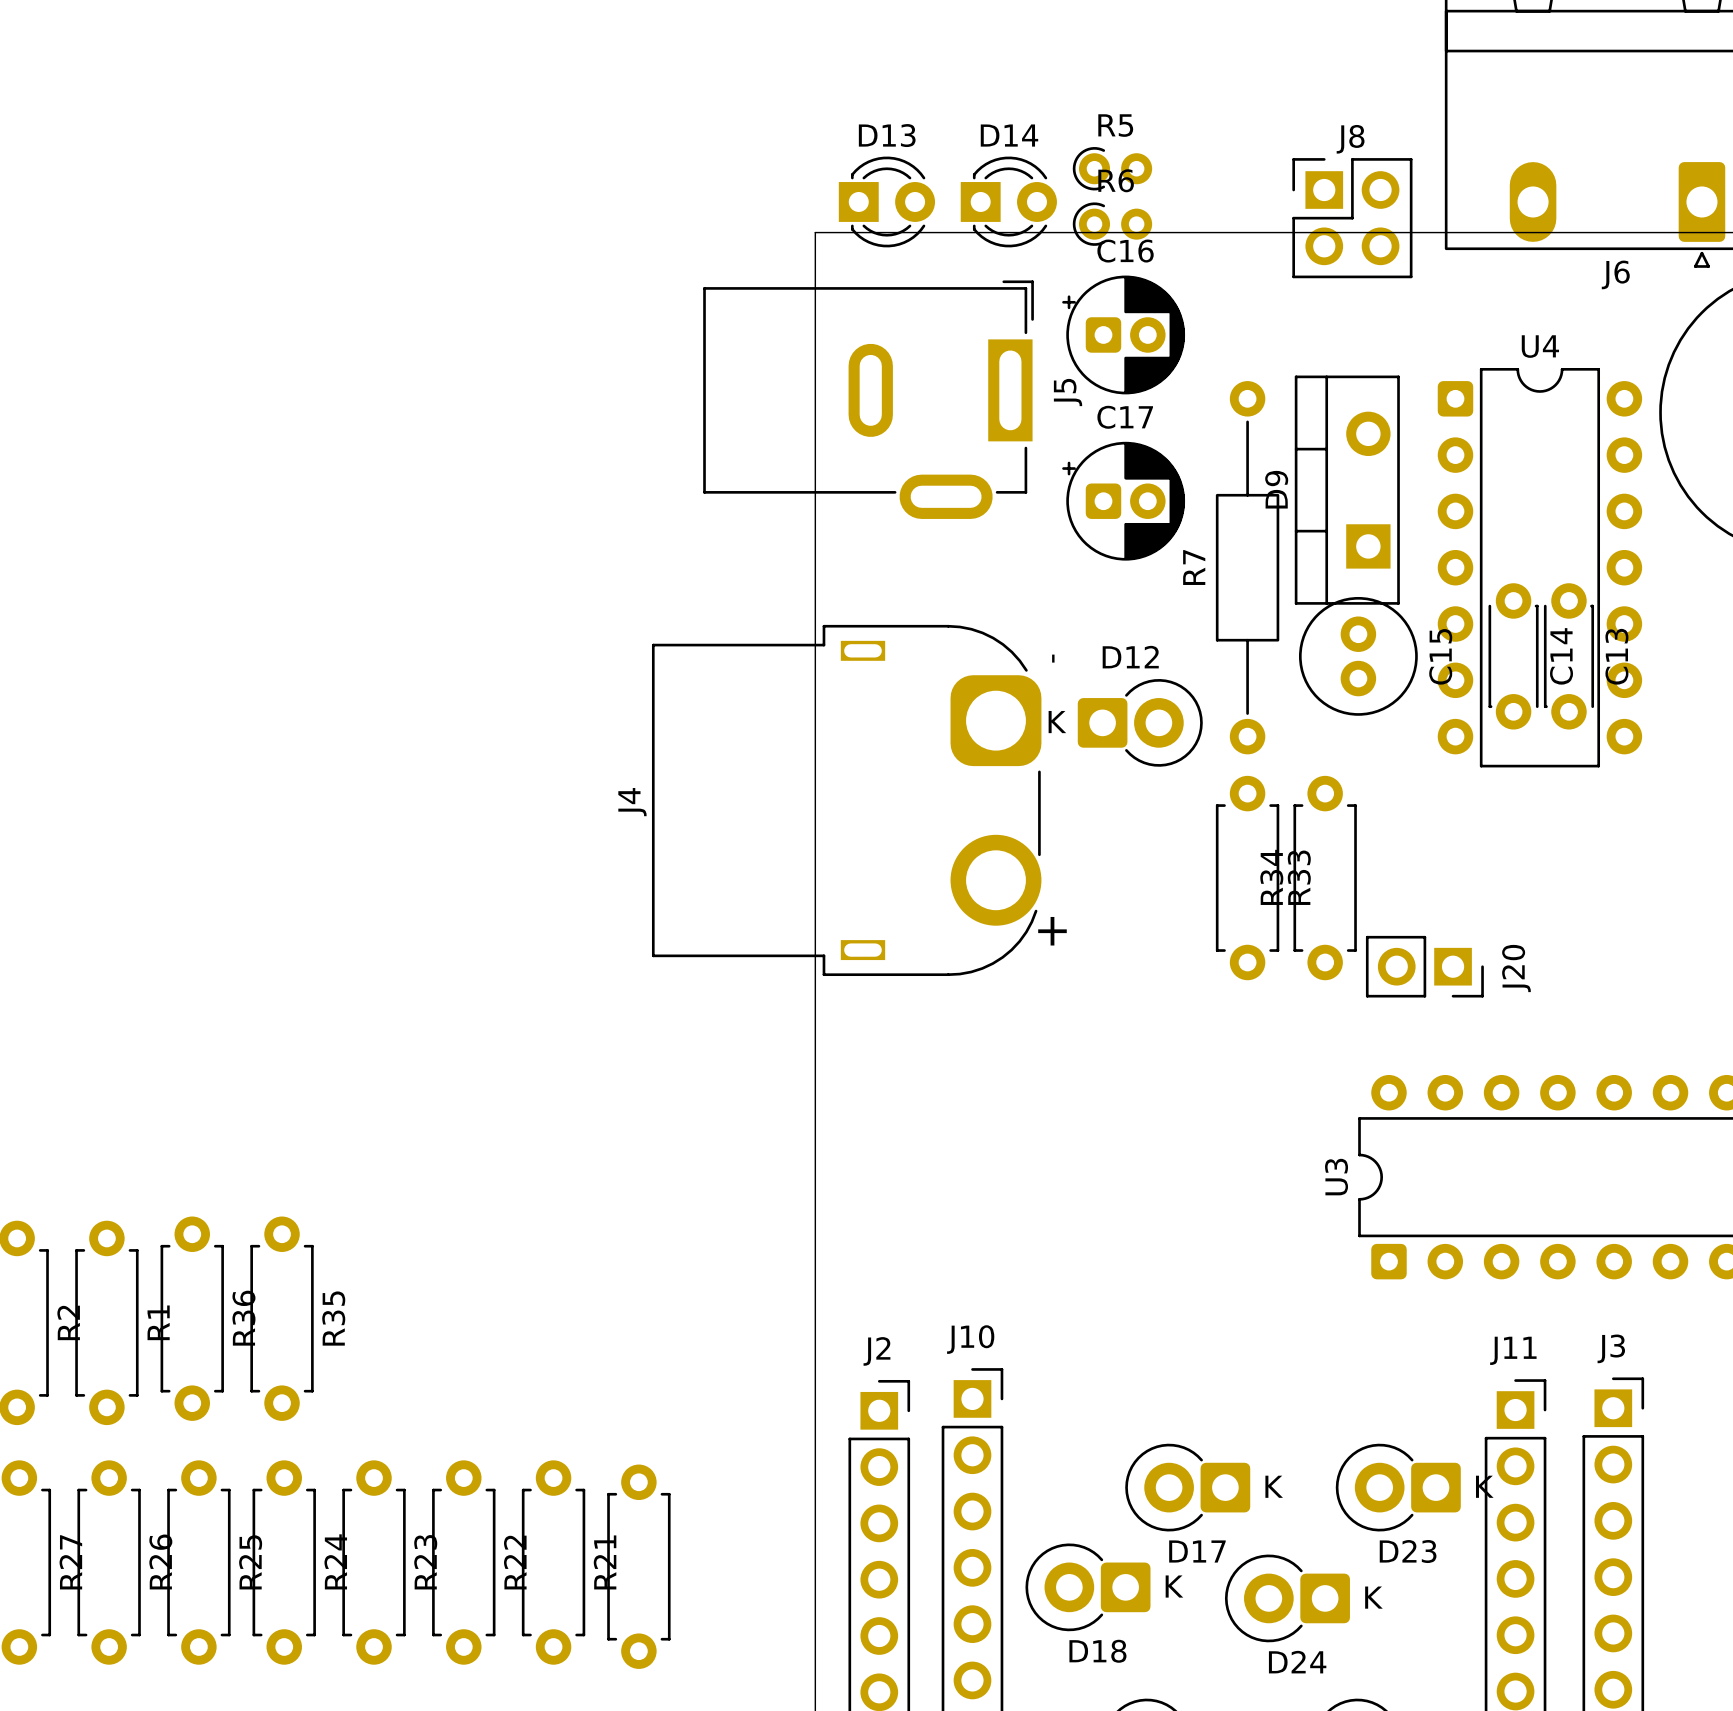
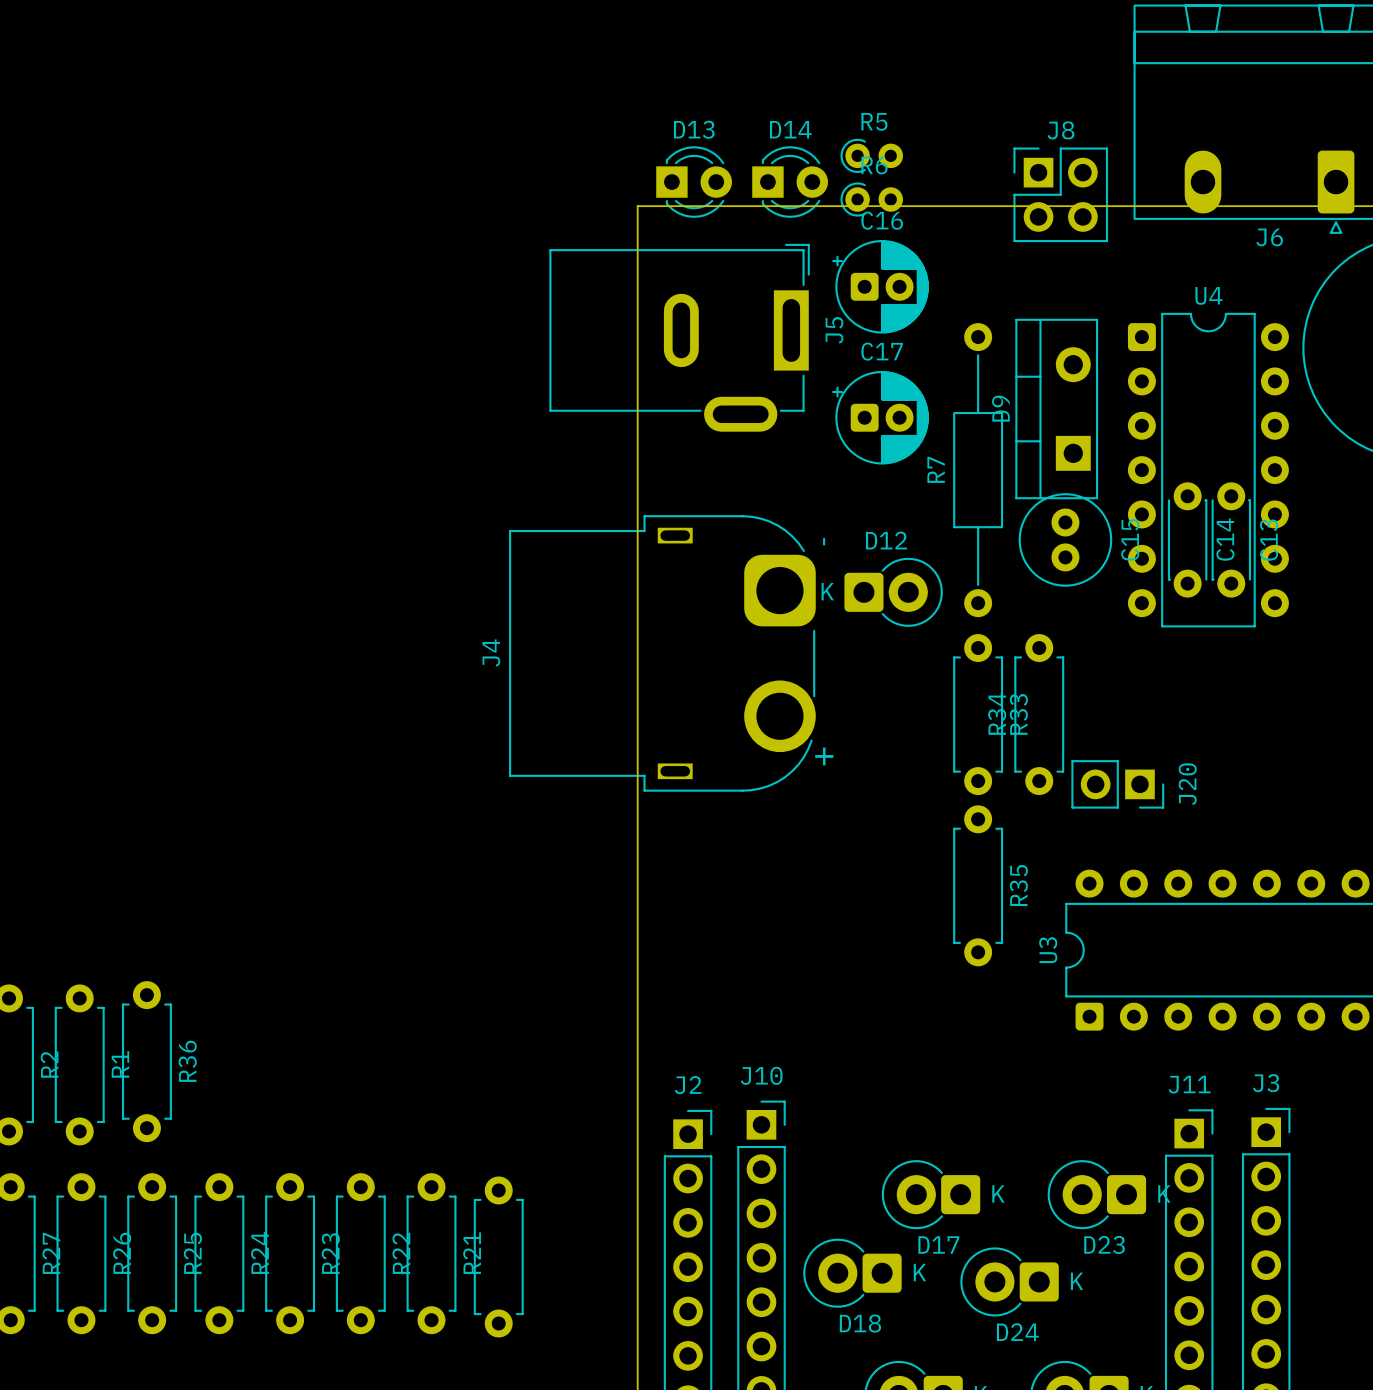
R35 position: (282, 1318) -> (978, 885)

